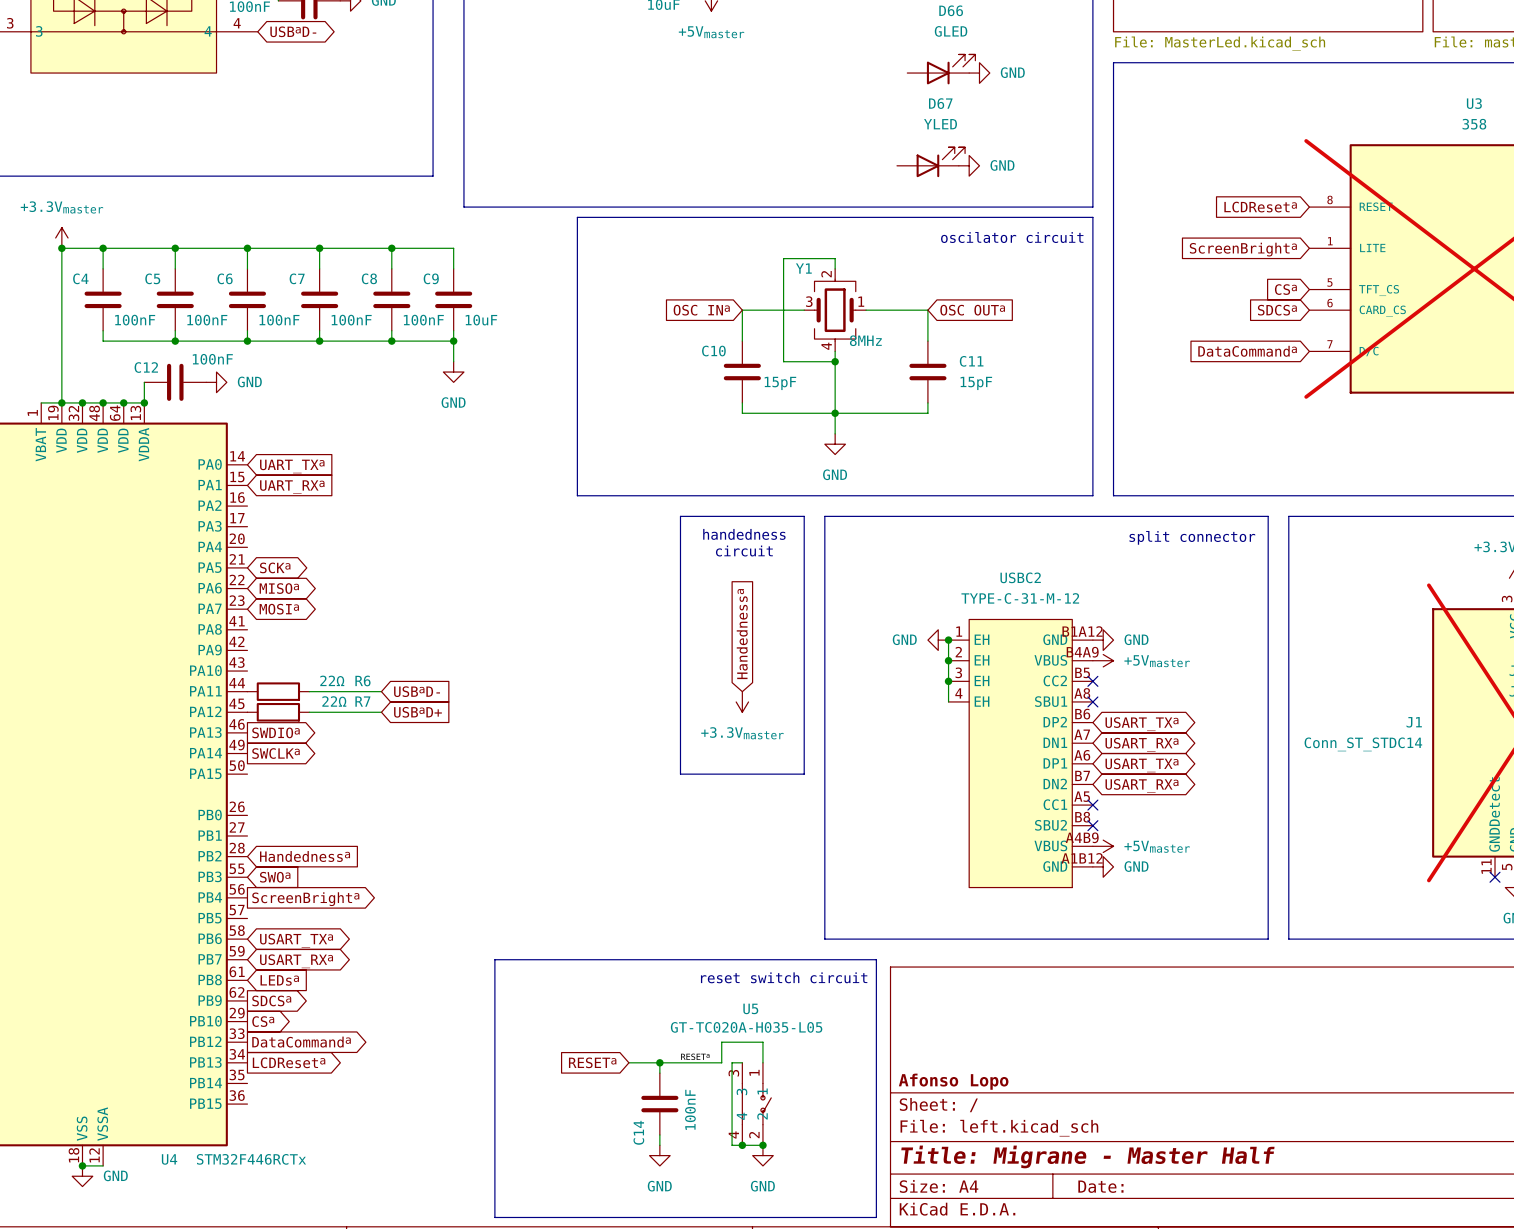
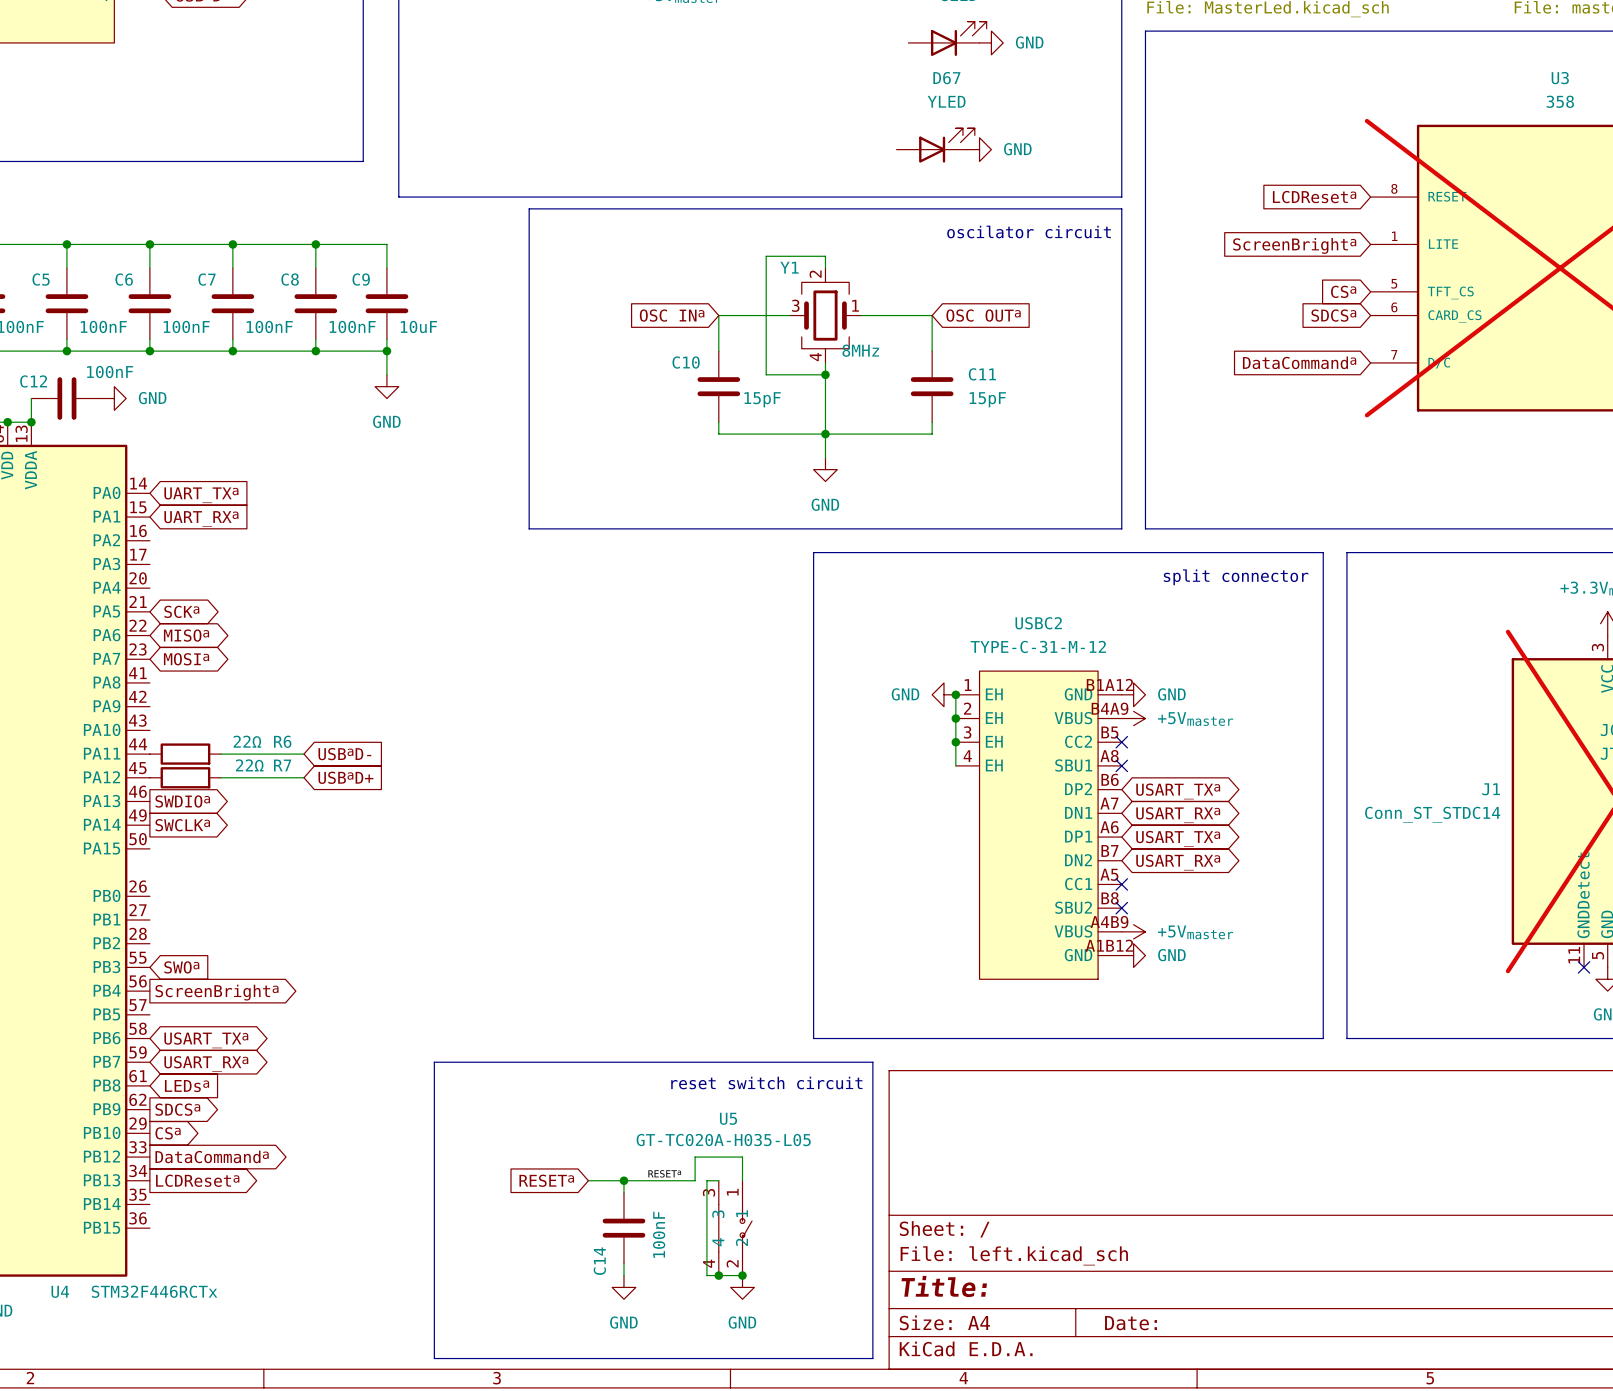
line: (680, 516) (804, 516) (804, 774) (680, 774) (680, 516) -> none
text: handedness (744, 534) -> none
text: circuit (744, 551) -> none
global label: Handednessa (742, 634) -> none
power symbol: +3.3Vmaster (742, 701) -> none
global label: Handednessa (305, 856) -> none
title block: Afonso Lopo (953, 1081) -> none
title block: Title: Migrane - Master Half (1087, 1156) -> Title: (944, 1286)

